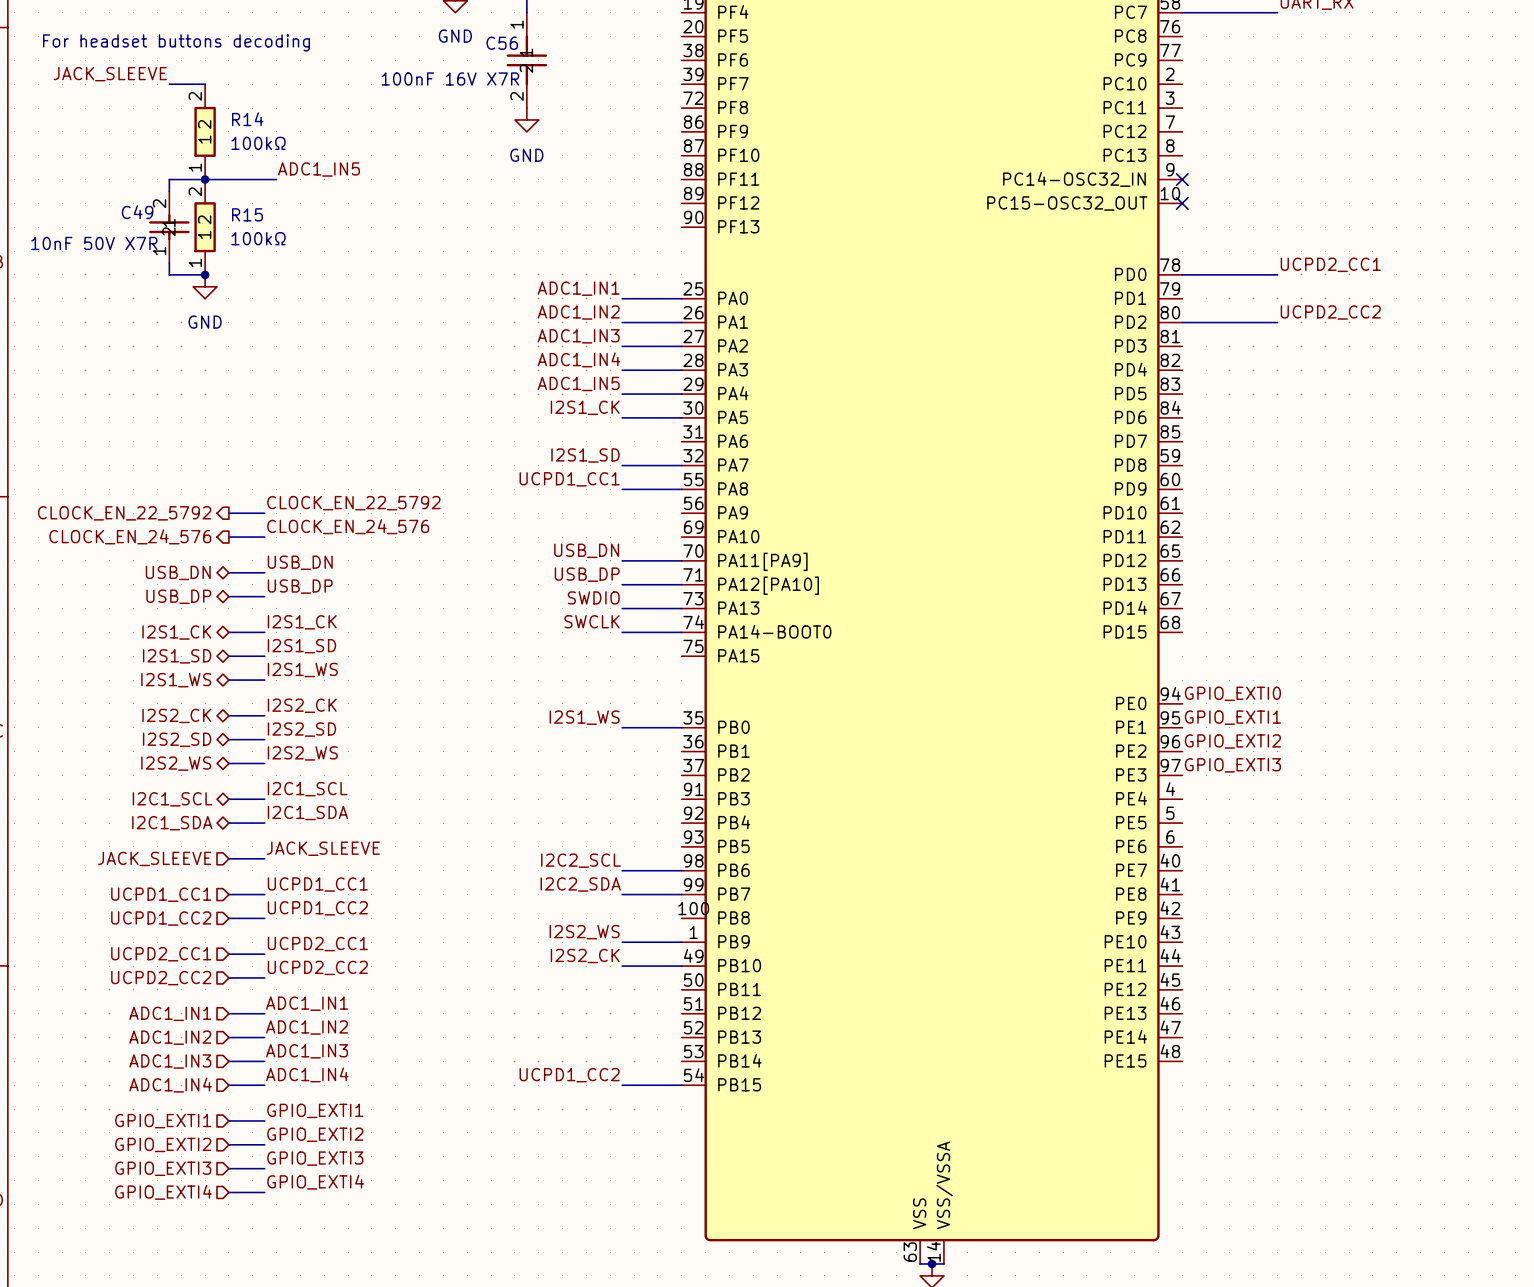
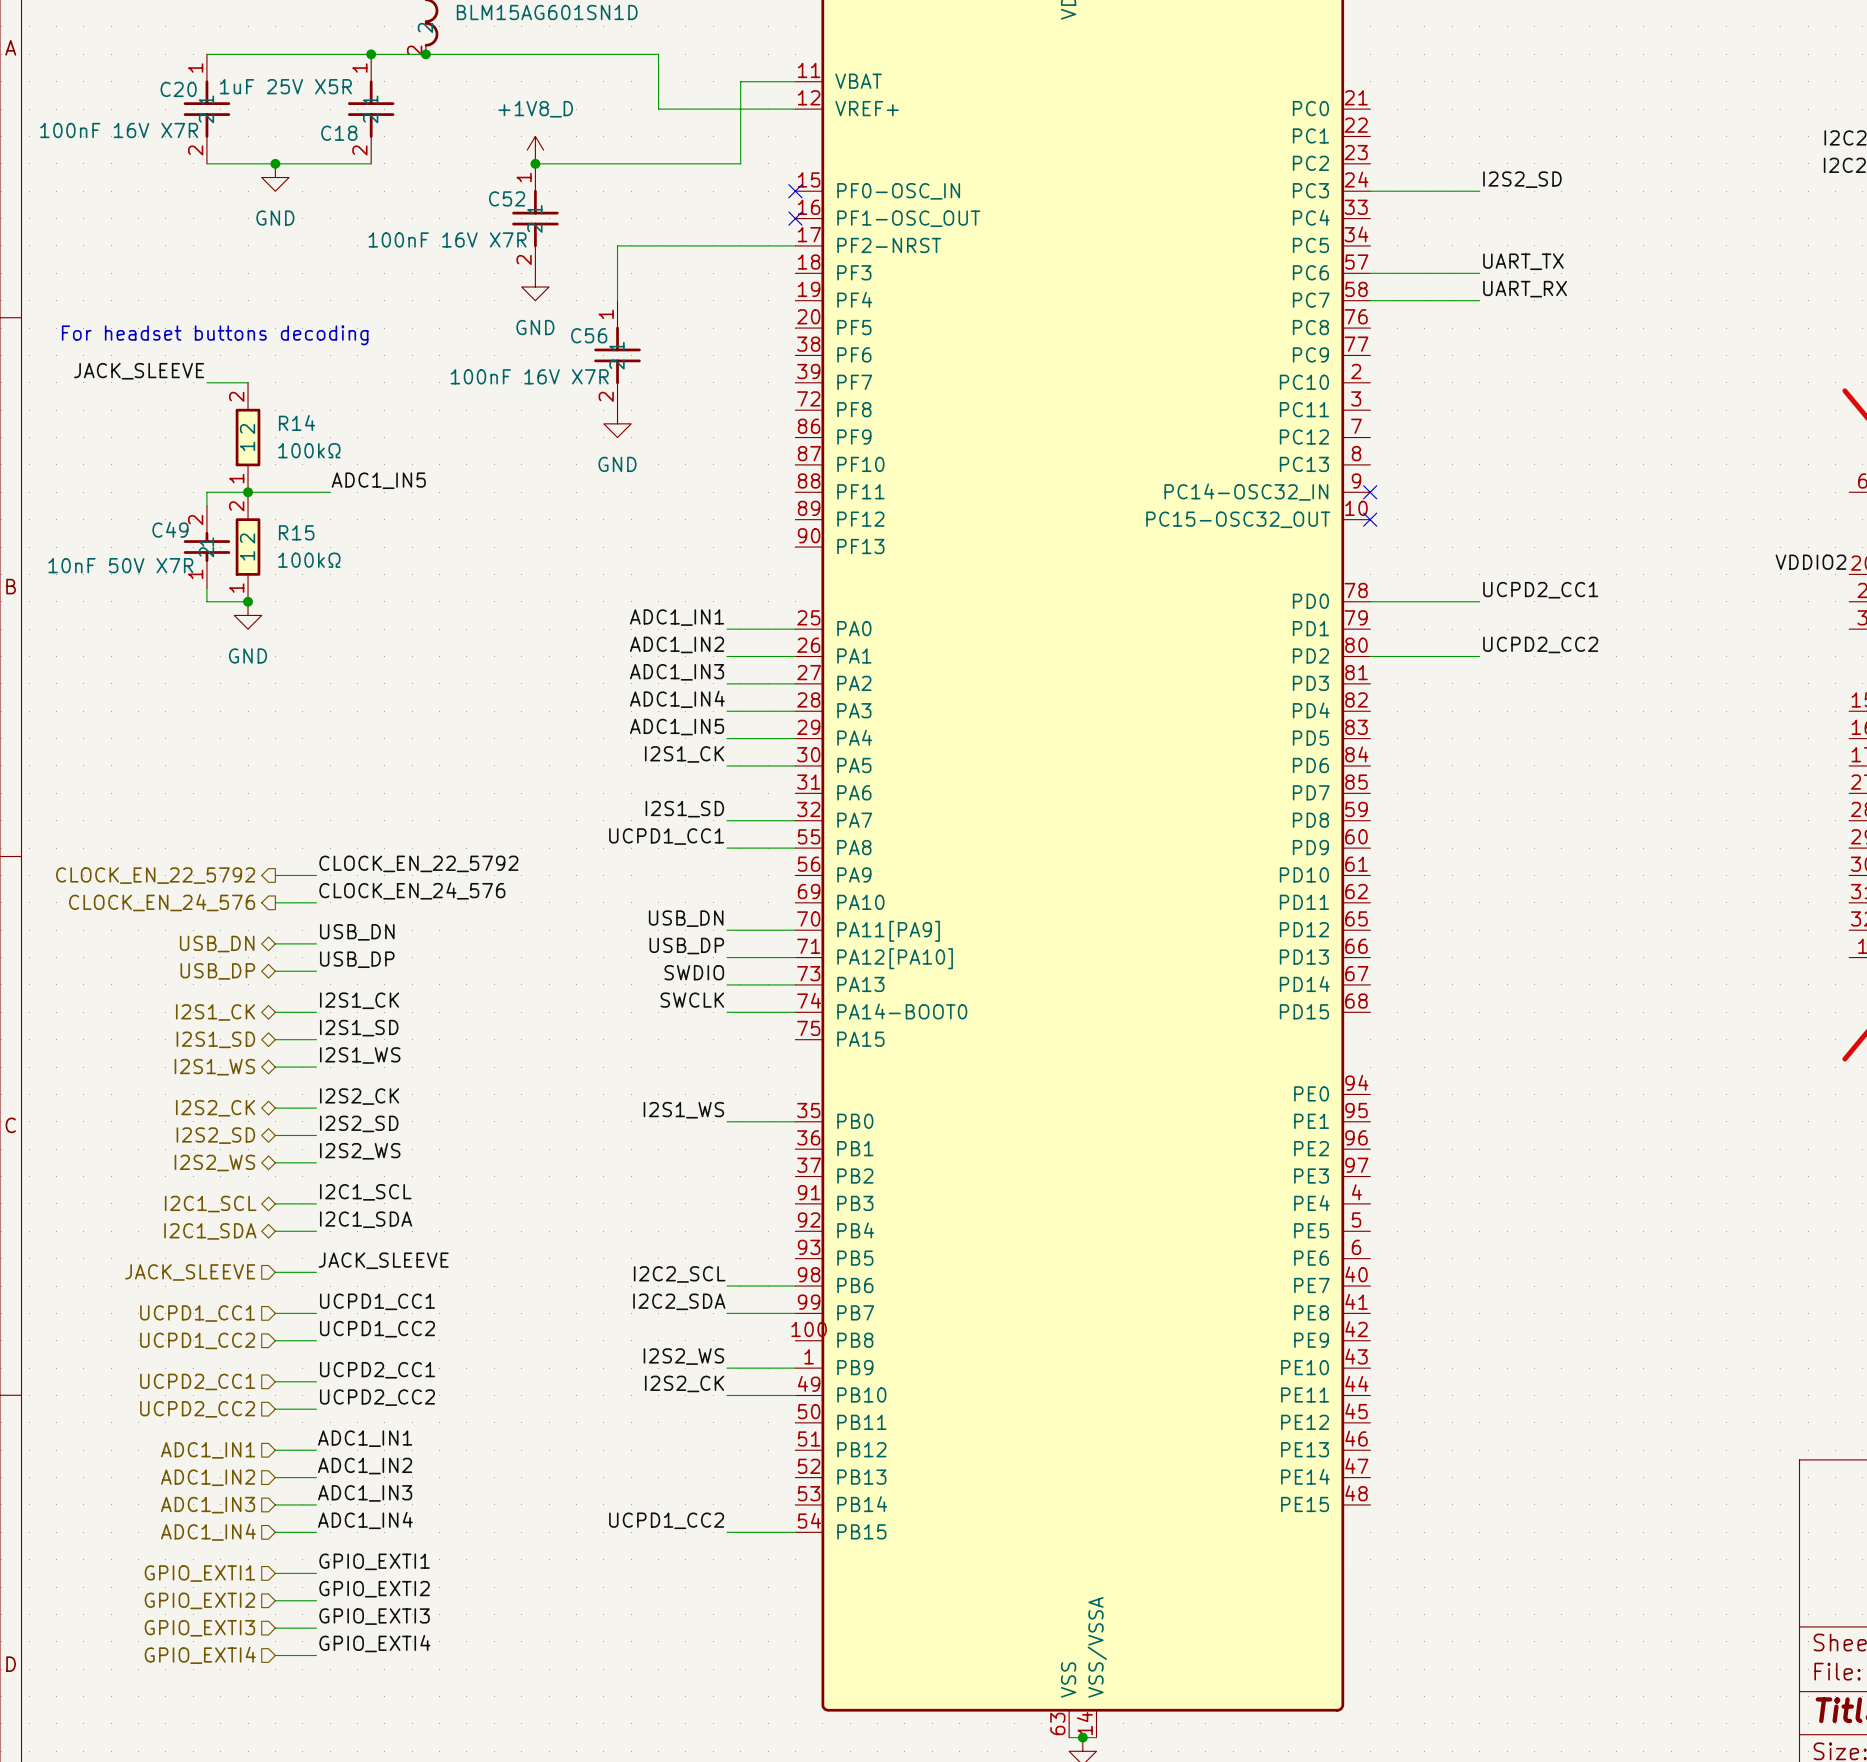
label: GPIO_EXTI0 (1232, 693) -> none
label: GPIO_EXTI1 (1232, 717) -> none
label: GPIO_EXTI2 (1232, 741) -> none
label: GPIO_EXTI3 (1232, 765) -> none

